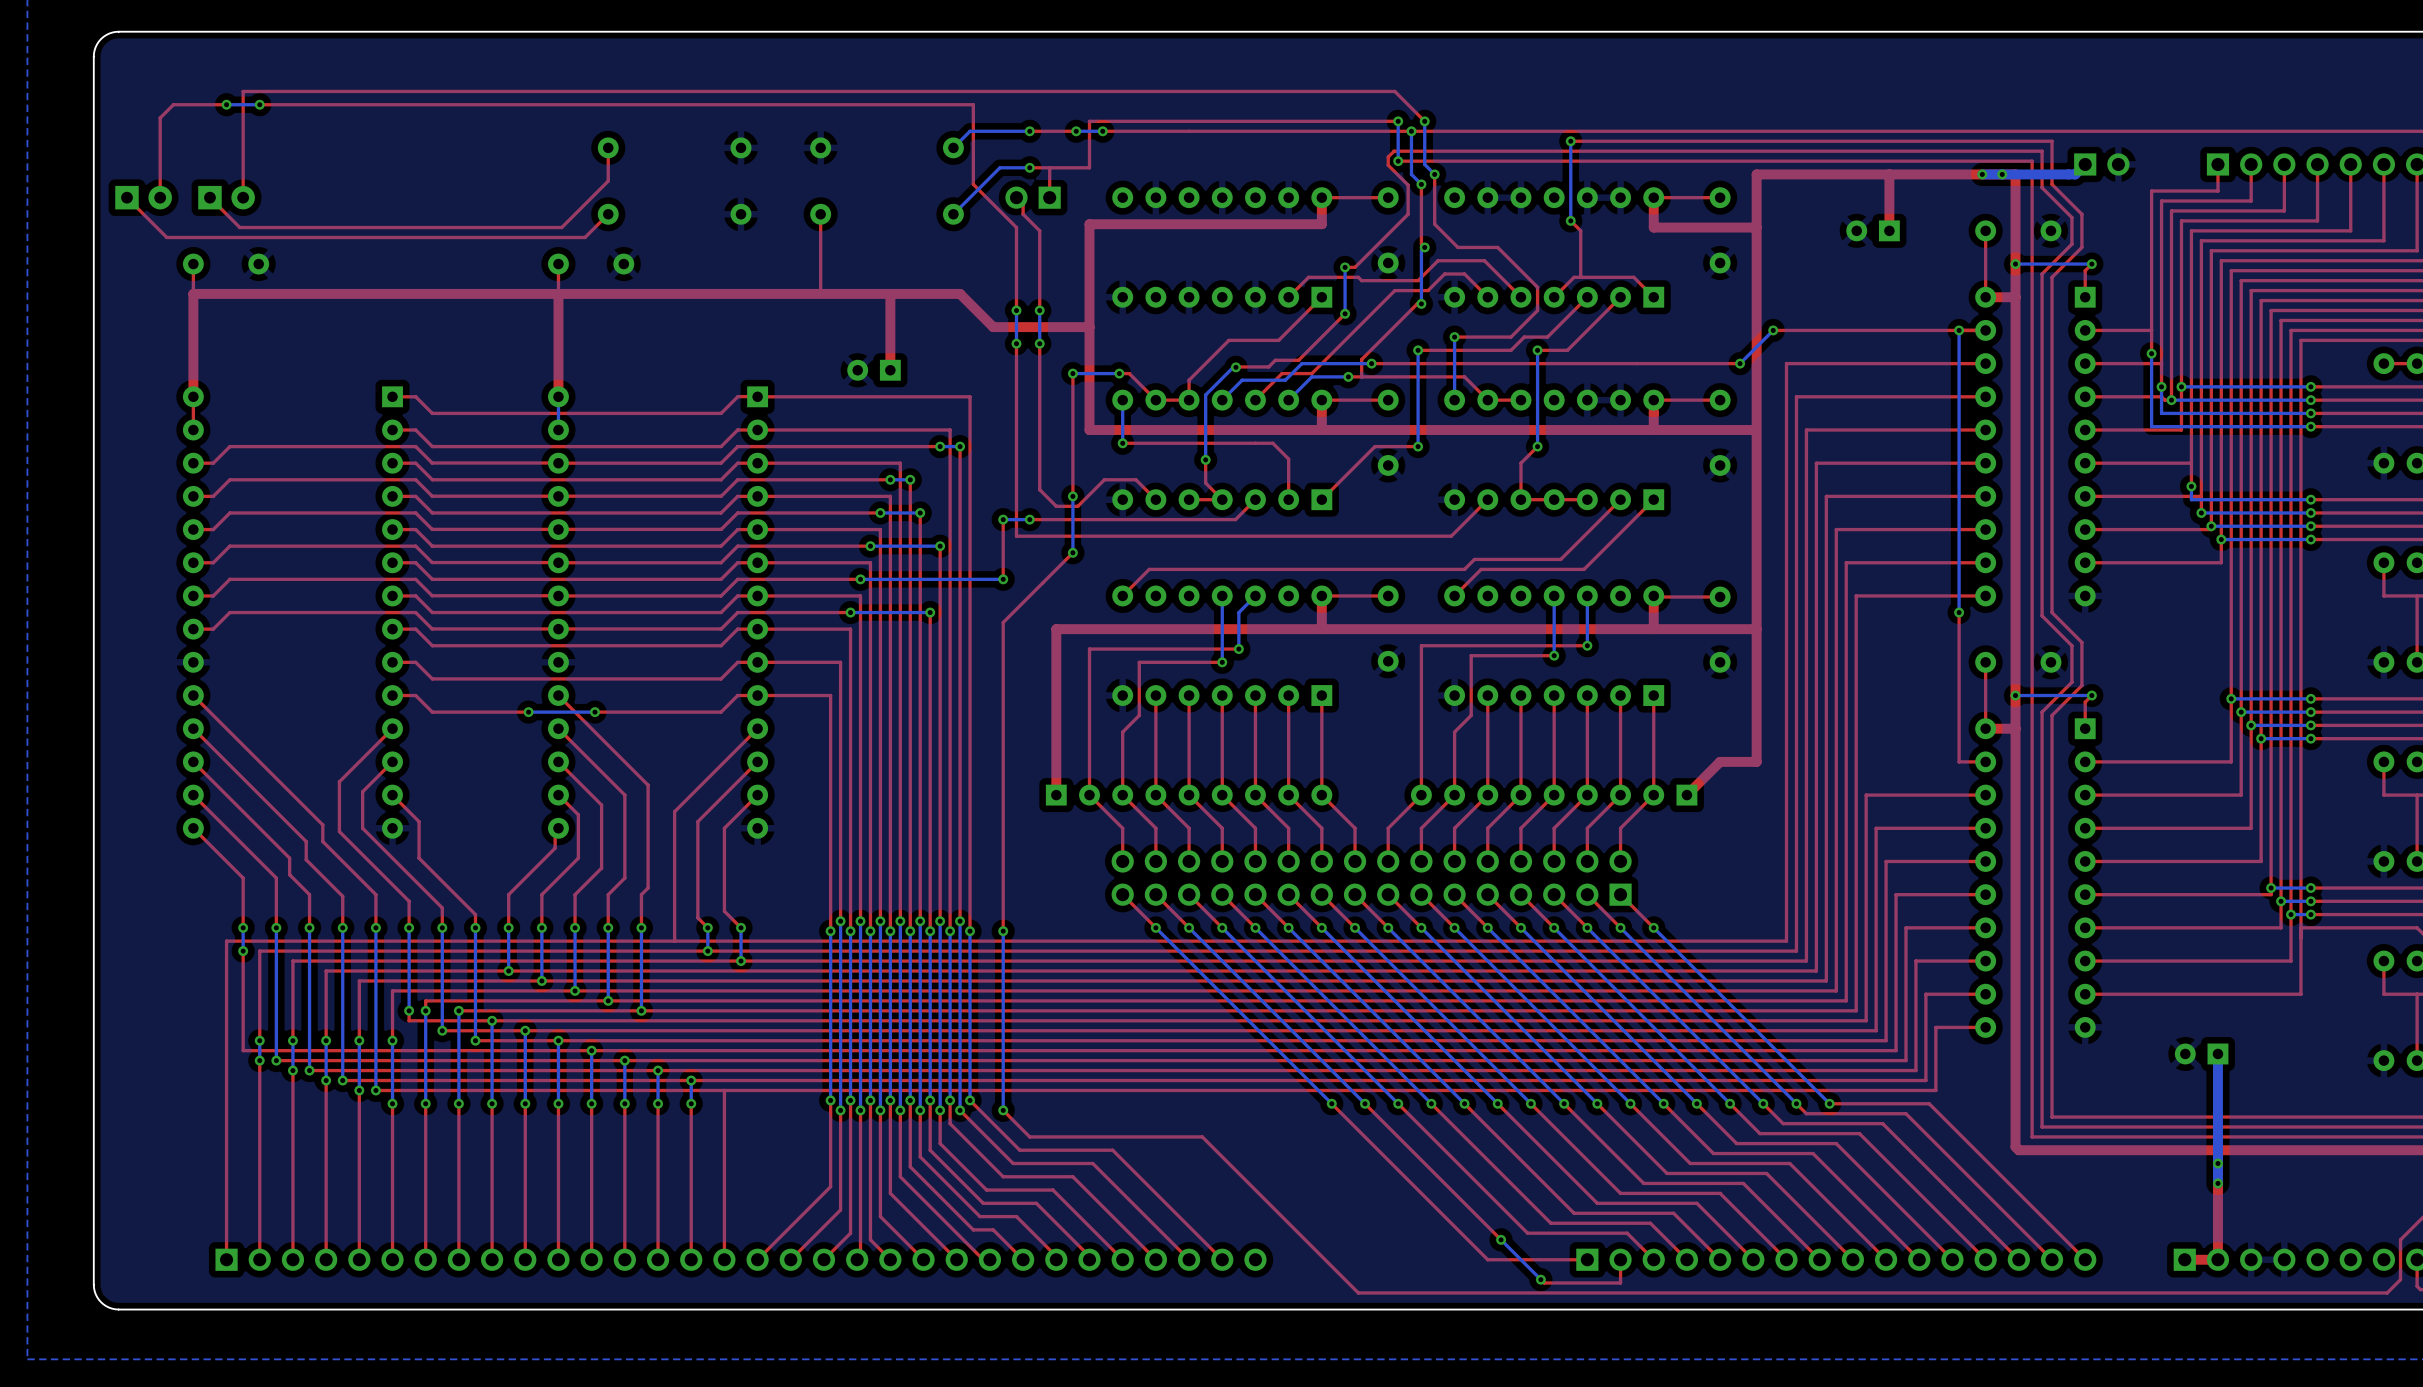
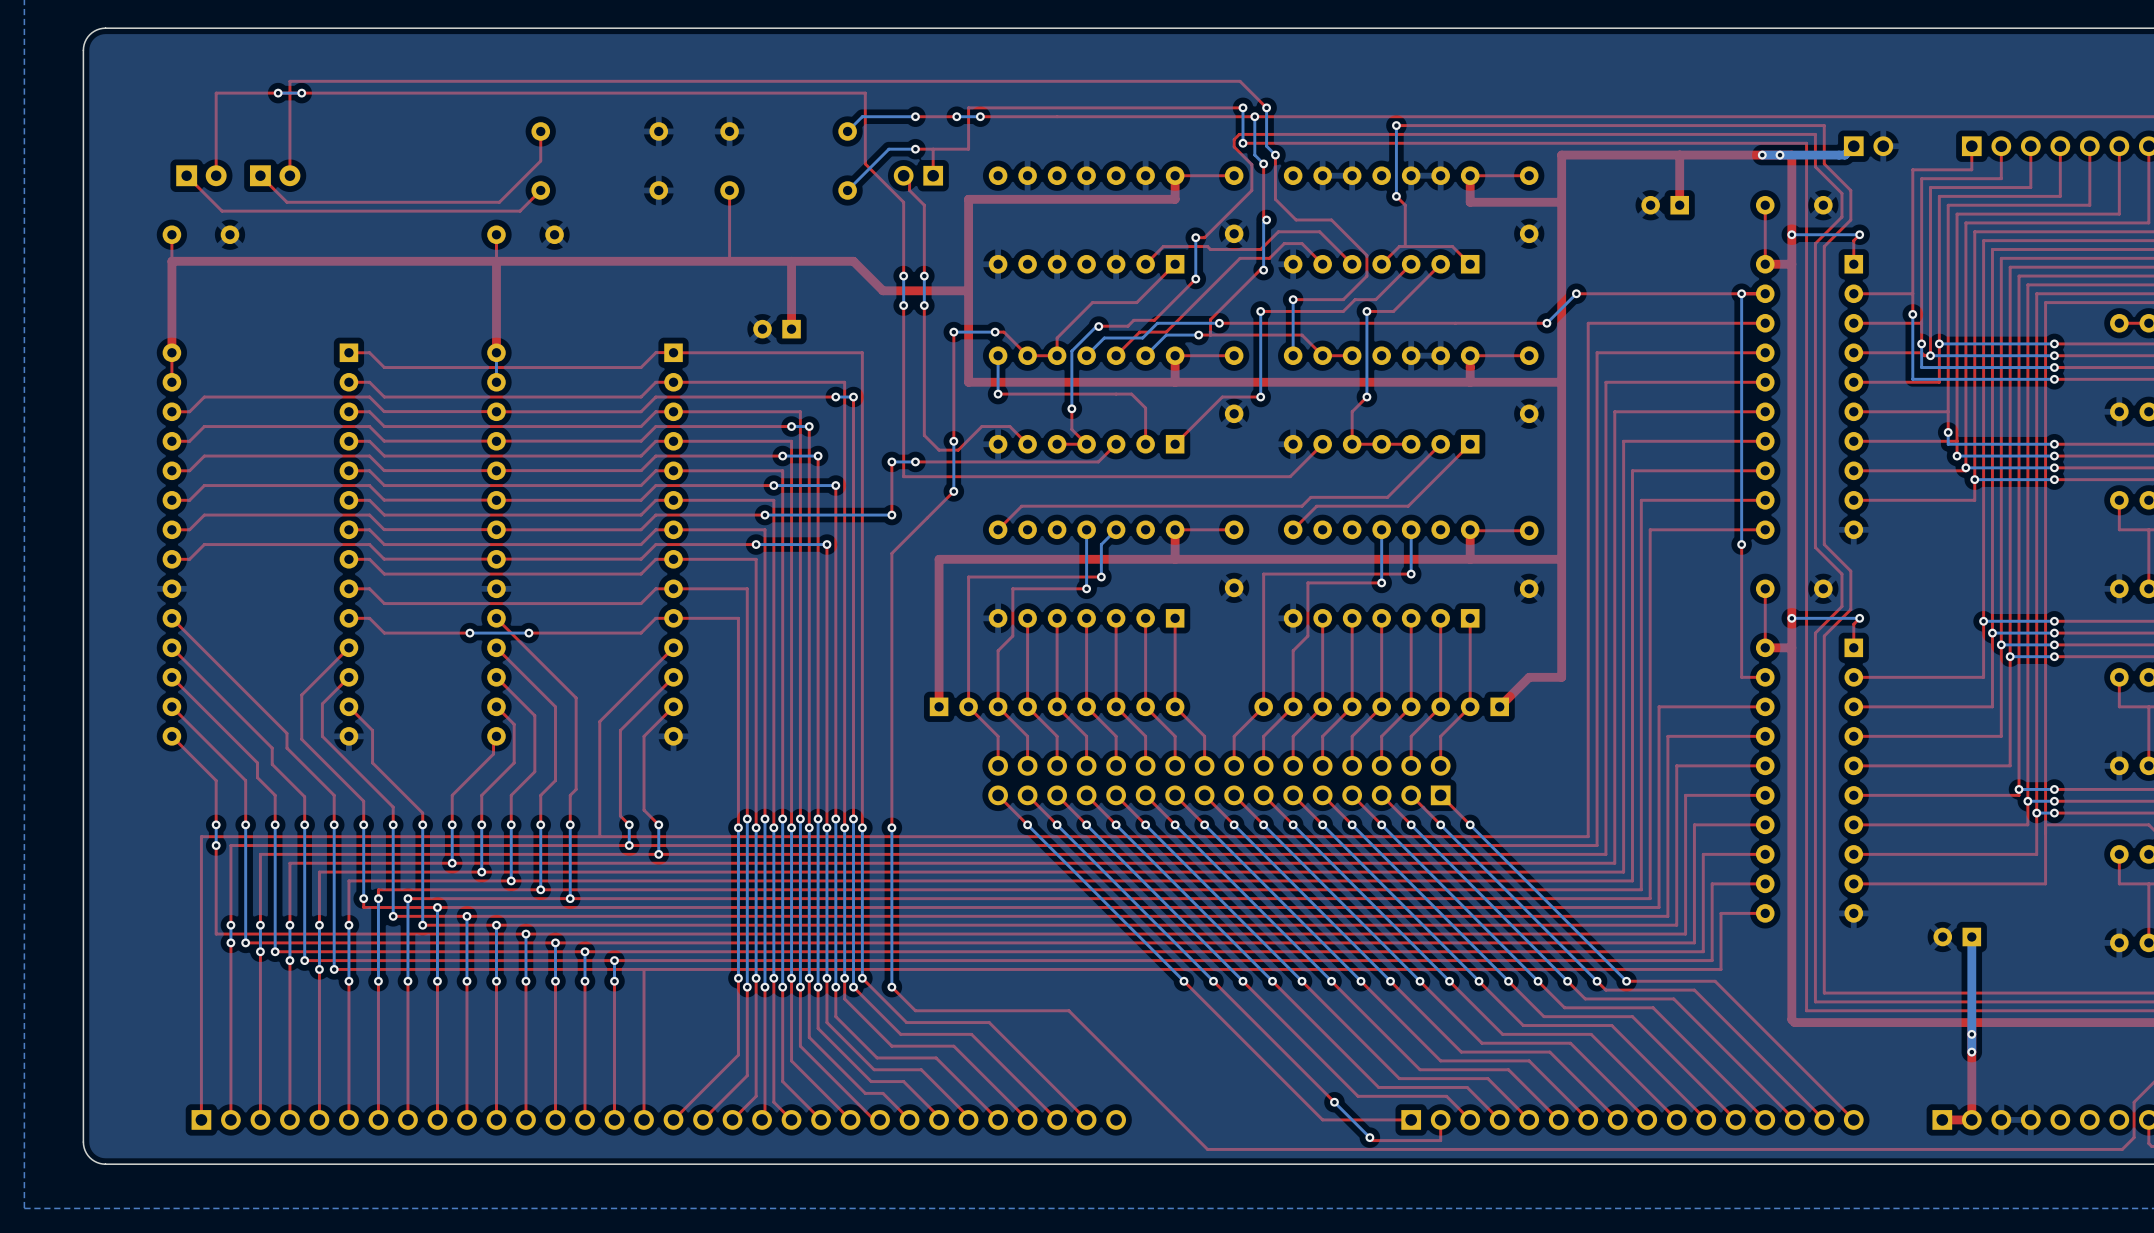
top track: (326, 91) (243, 91) (243, 104) -> (230, 93) (216, 93)
top track: none -> (289, 81) (289, 175)
top track: (226, 104) (173, 104) (160, 118) (160, 197) -> none
via: (226, 104) -> none
bottom track: (259, 104) (226, 104) -> none
via: (259, 104) -> none
via: none -> (278, 93)
bottom track: none -> (301, 93) (278, 93)
via: none -> (301, 93)
top track: (126, 197) (166, 237) (249, 237) -> (213, 202) (222, 211)
part position: (143, 197) -> (275, 175)
top track: (322, 227) (239, 227) -> (286, 202) (260, 175)

